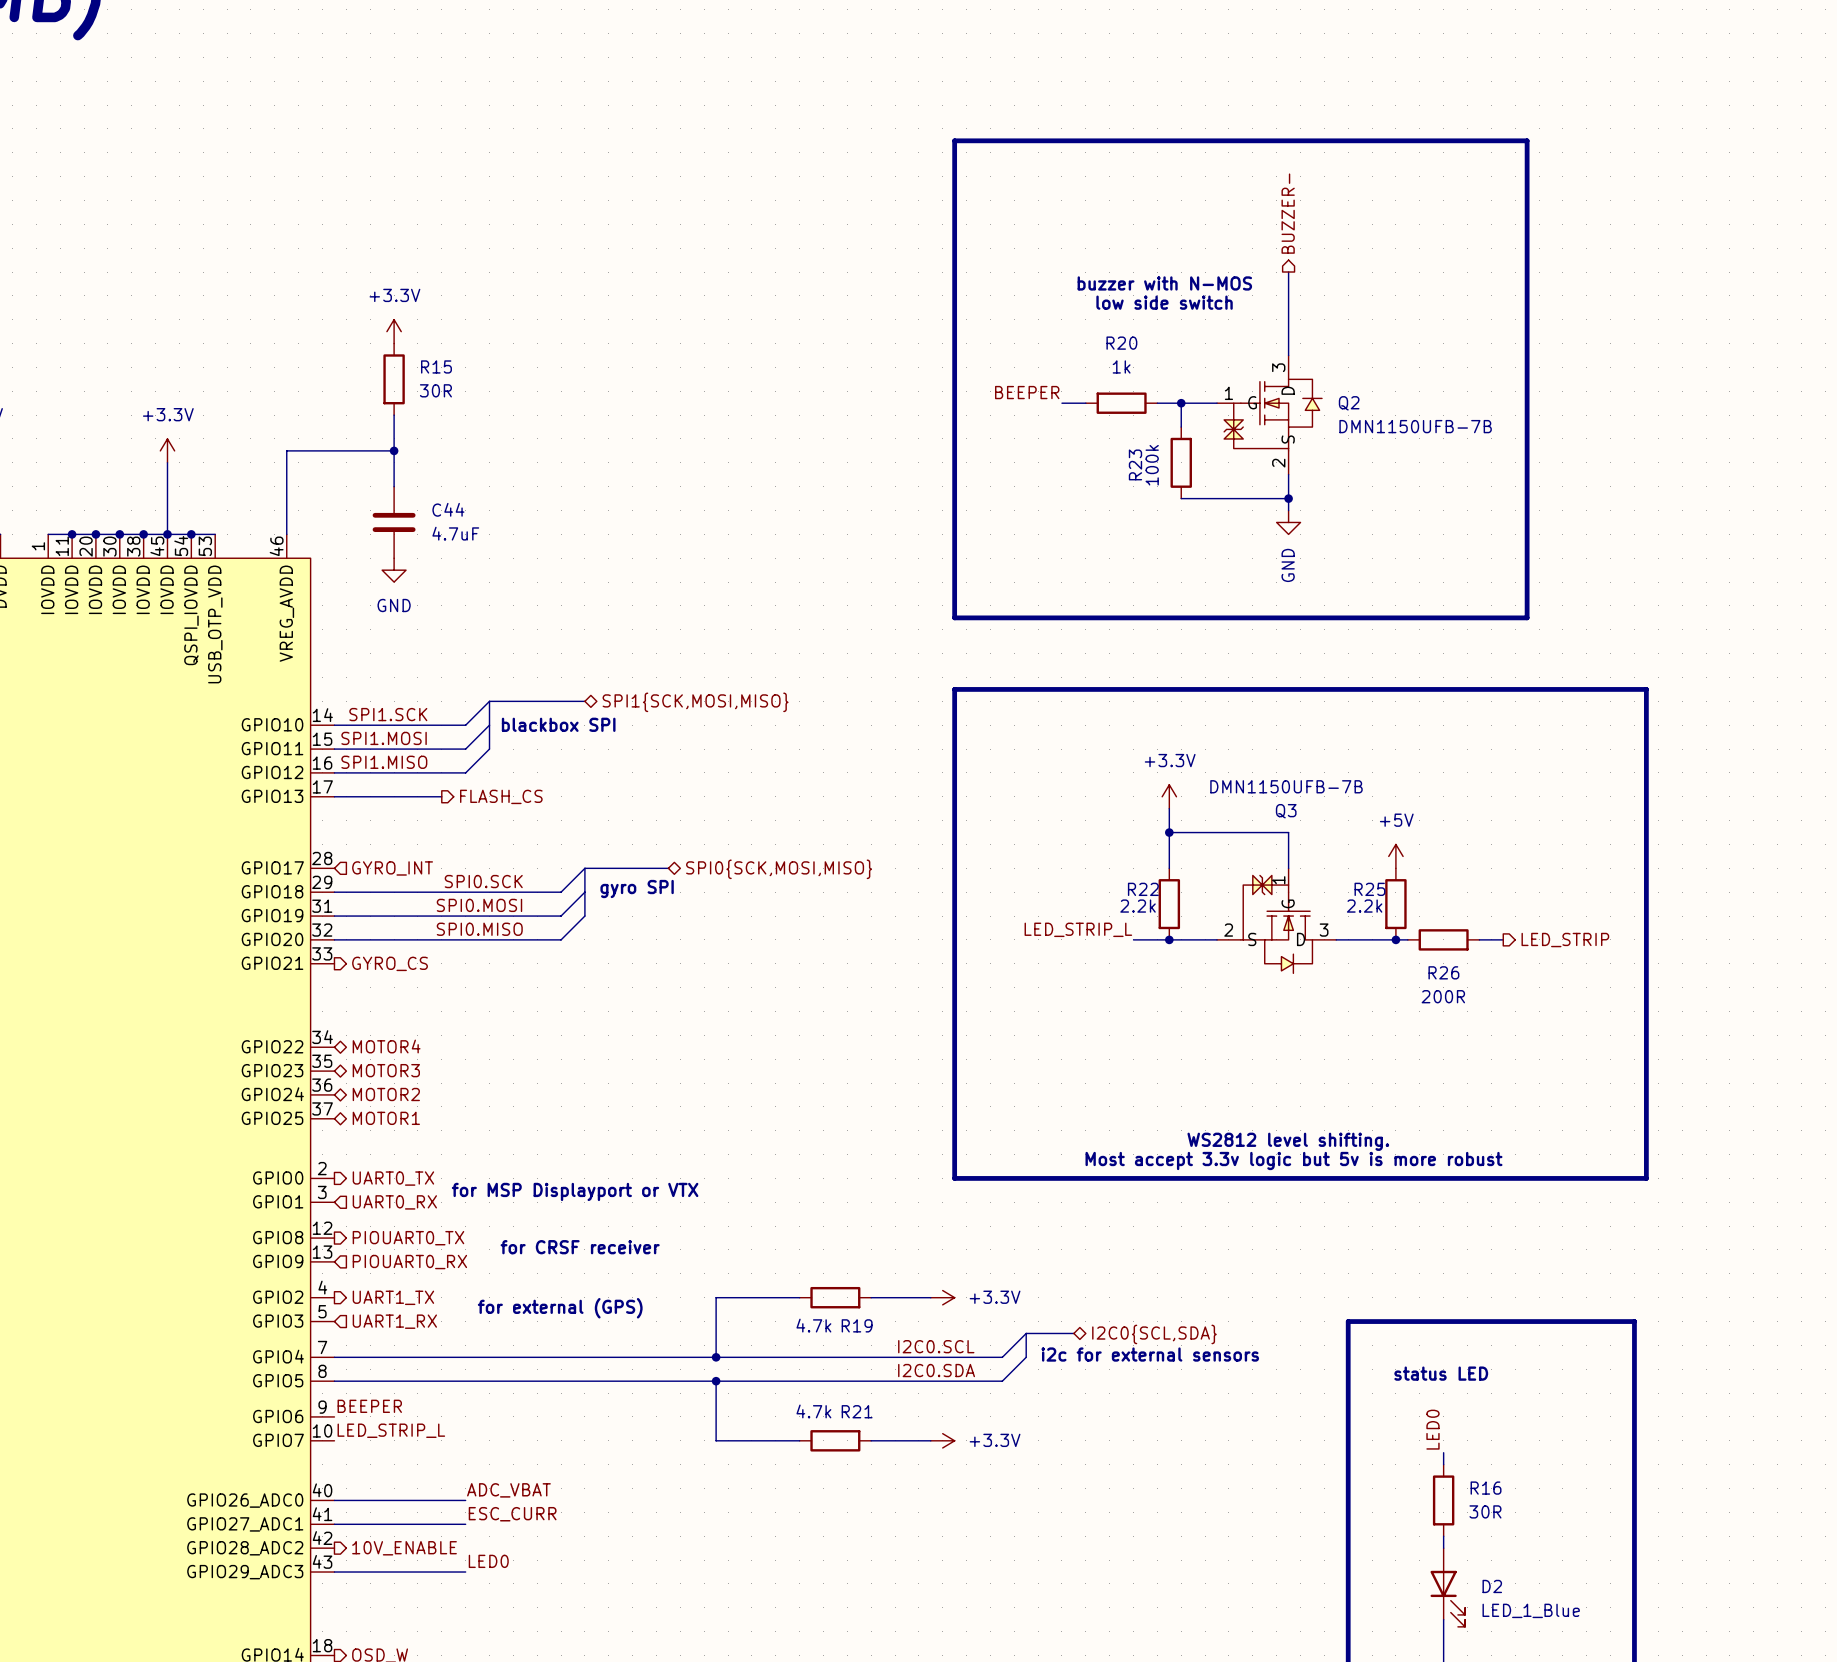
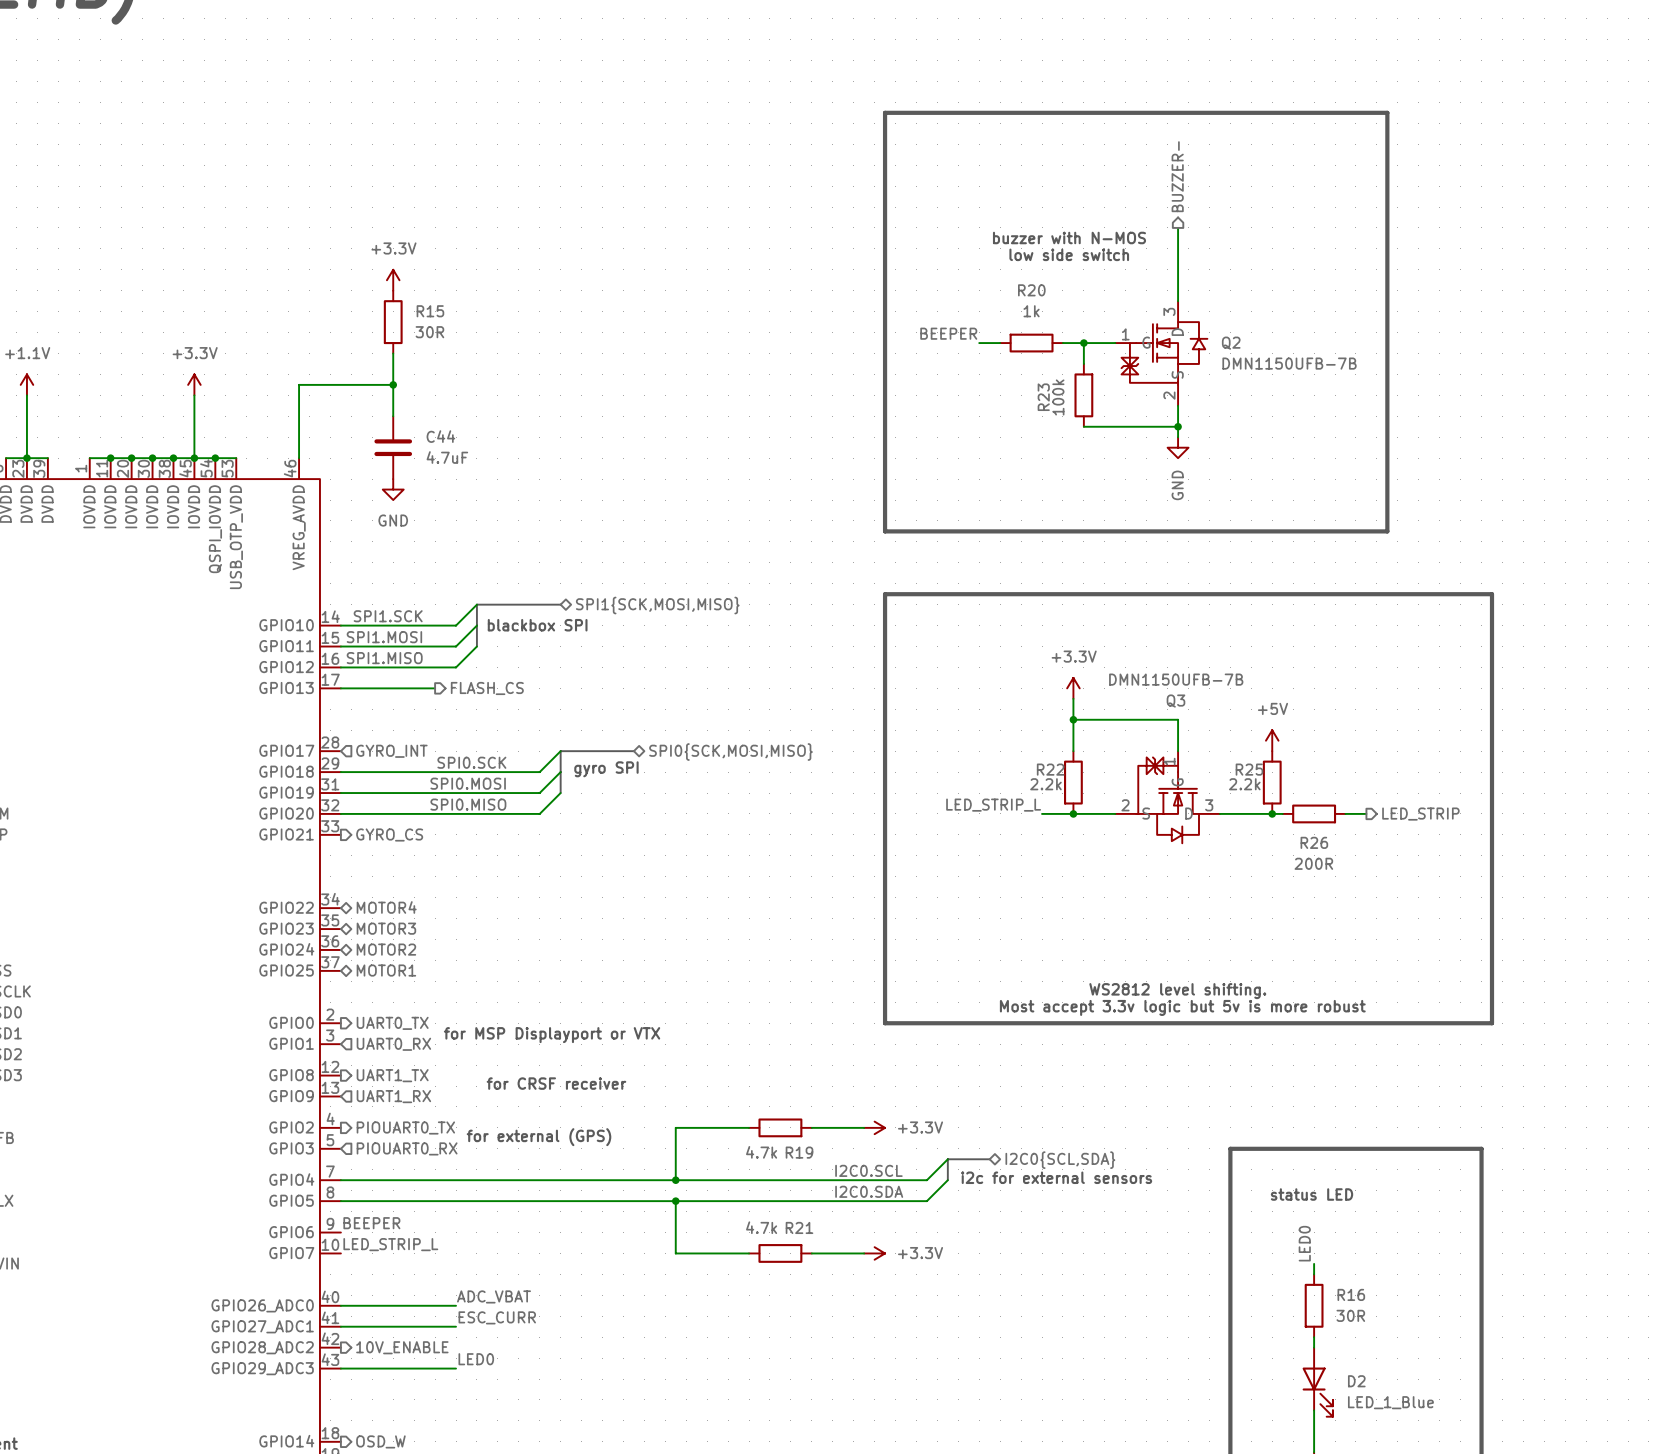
hierarchical label: PIOUART0_TX (408, 1238) -> UART1_TX (392, 1075)
hierarchical label: PIOUART0_RX (409, 1262) -> UART1_RX (393, 1096)
hierarchical label: UART1_TX (393, 1297) -> PIOUART0_TX (405, 1127)
hierarchical label: UART1_RX (394, 1321) -> PIOUART0_RX (407, 1148)

